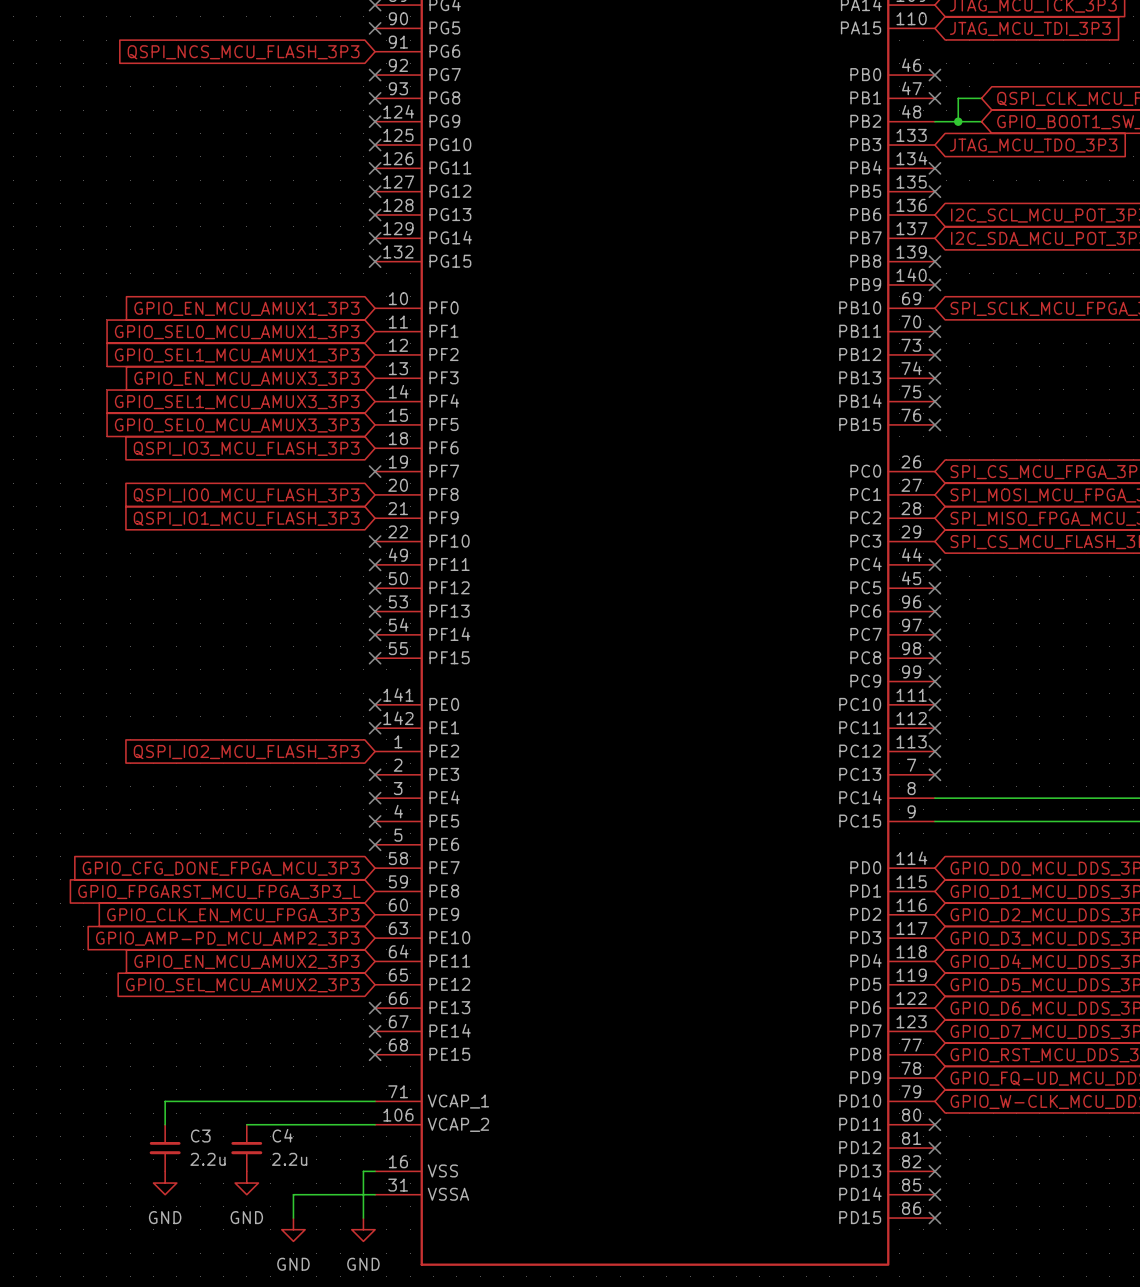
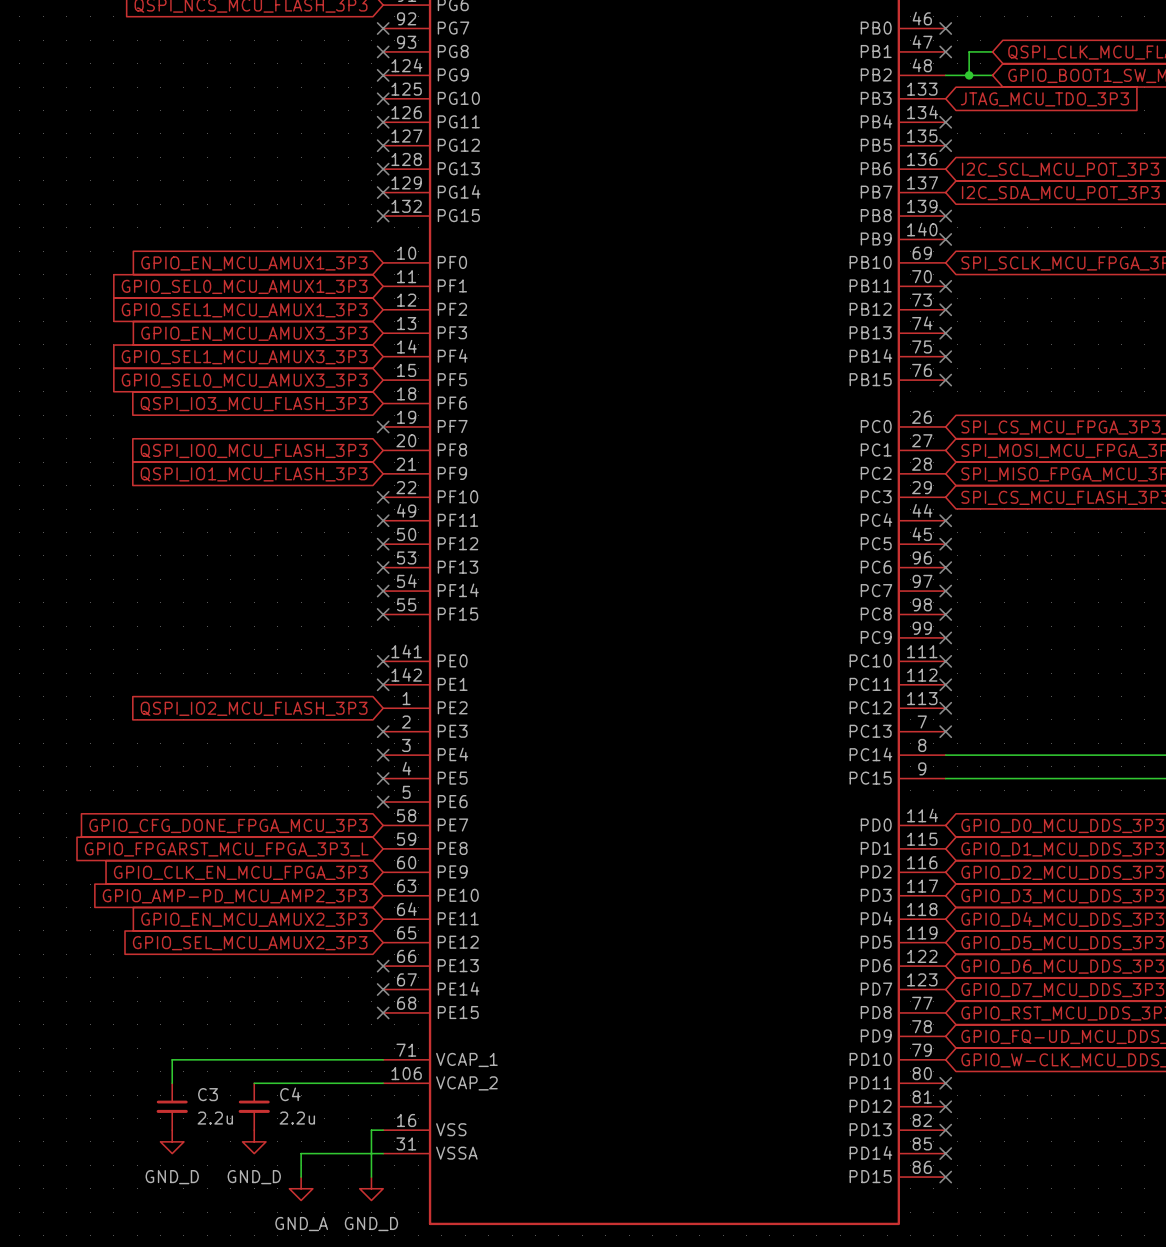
power symbol: GND (165, 1183) -> GND_D (172, 1141)
power symbol: GND (246, 1183) -> GND_D (254, 1141)
power symbol: GND (293, 1229) -> GND_A (301, 1188)
power symbol: GND (363, 1229) -> GND_D (371, 1188)

